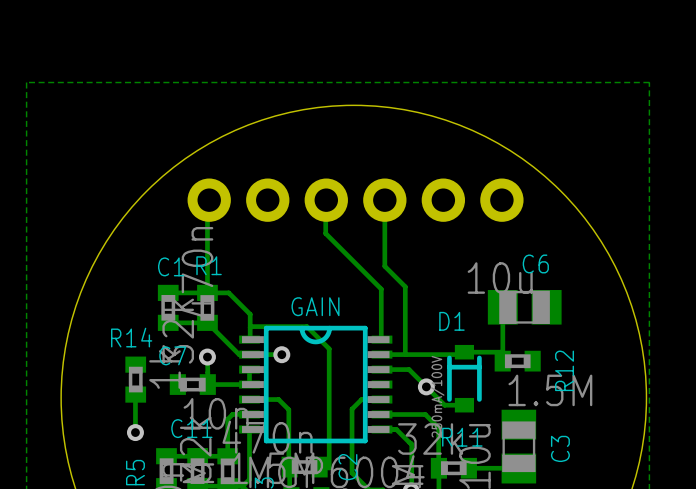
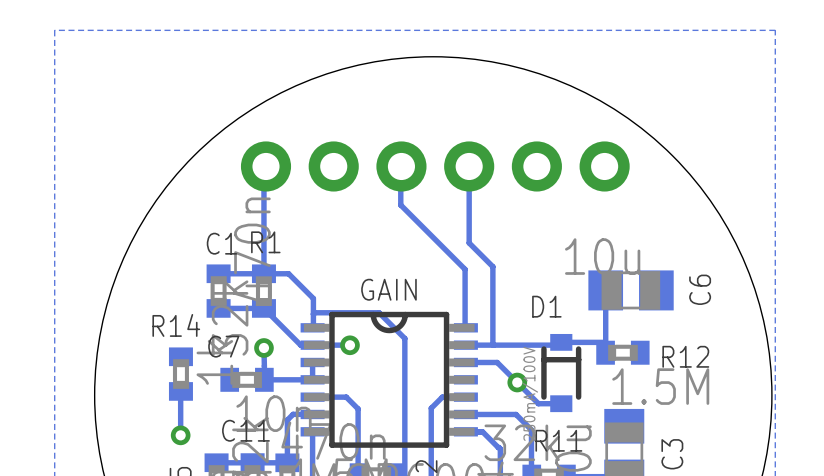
C6 name rotation: 0° (535, 263) -> 90° counterclockwise (700, 289)
C6 name position: C6 (535, 263) -> C6 (700, 289)
R12 name rotation: 0° (564, 370) -> 90° clockwise (685, 356)

